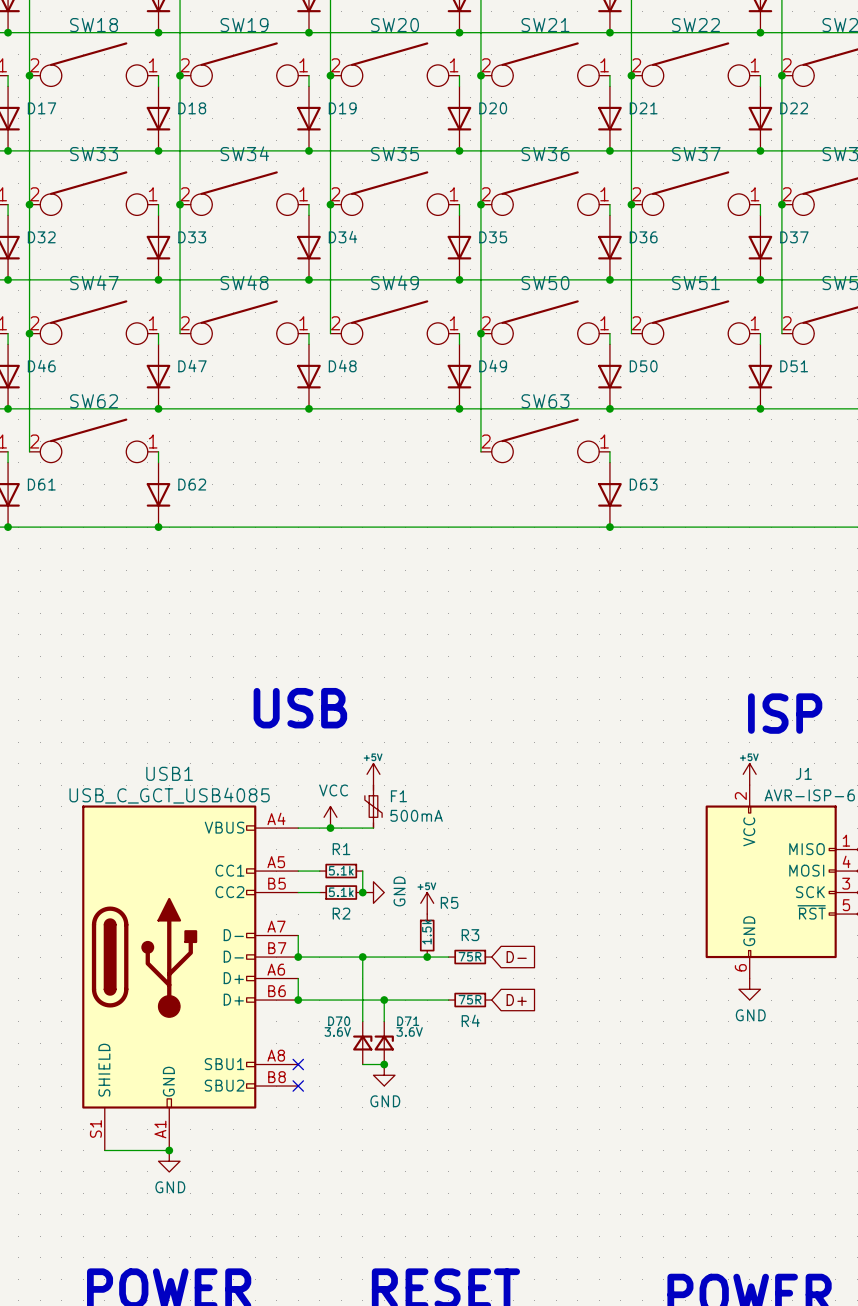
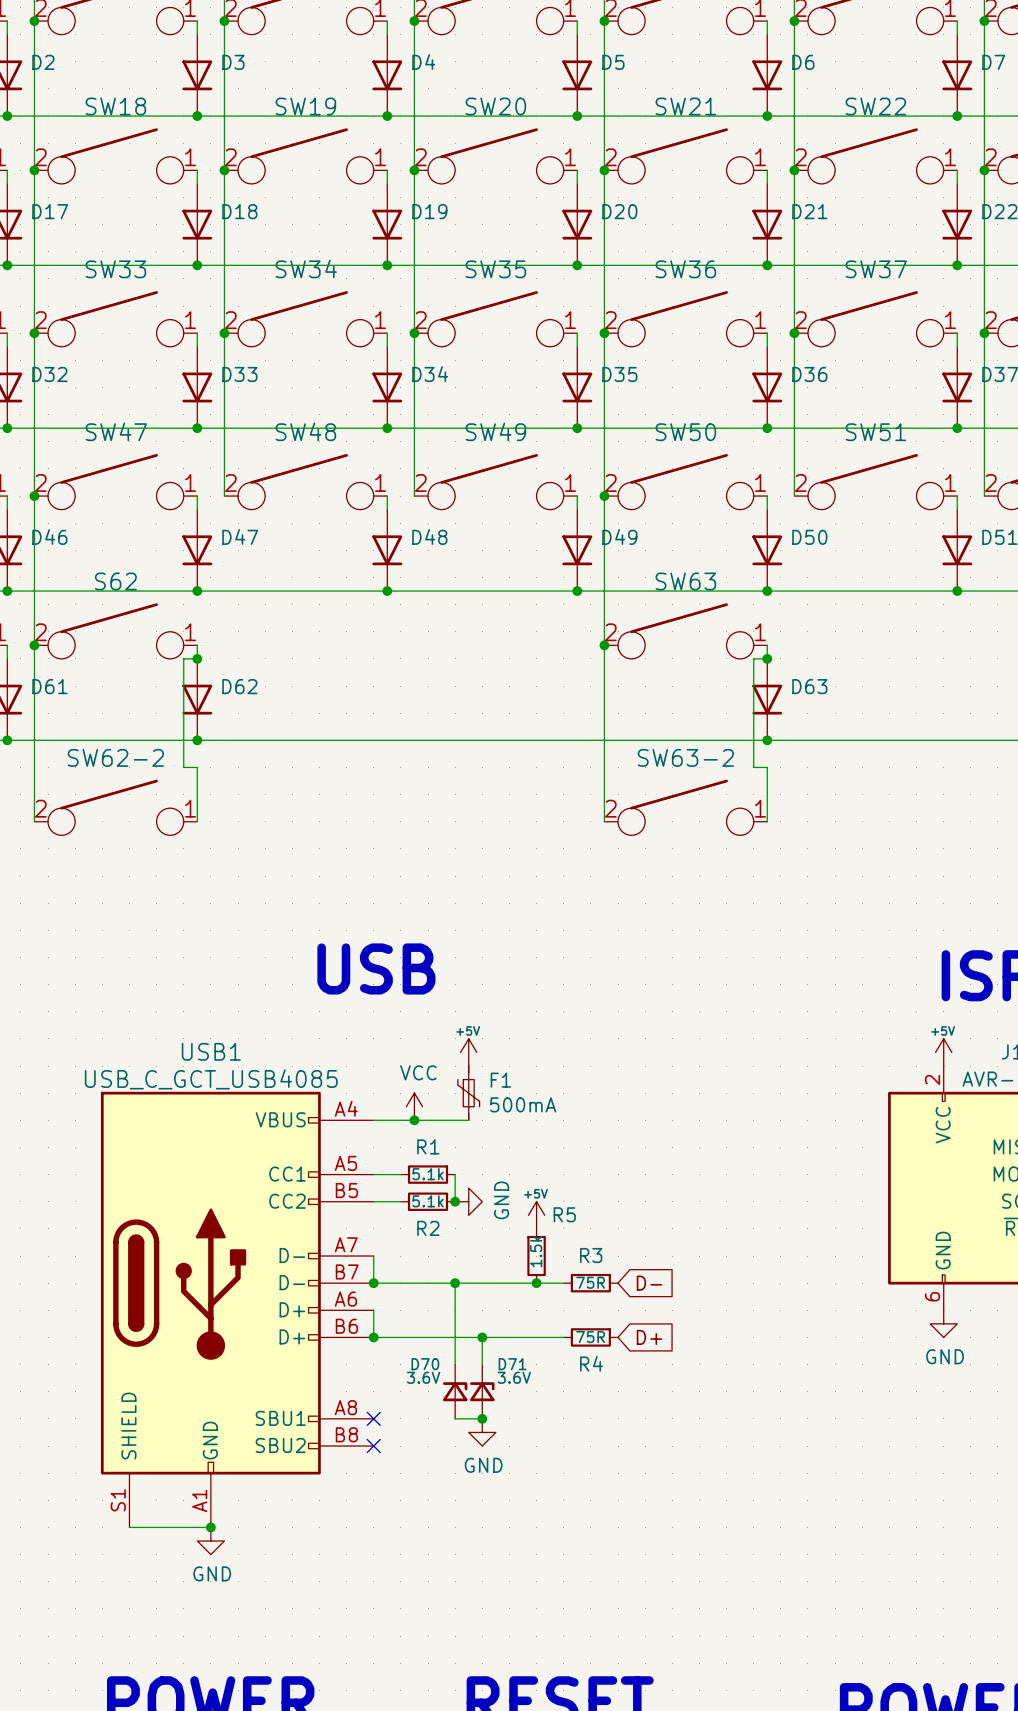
SW62 name: SW62 (94, 401) -> S62 (115, 581)
wire: none -> (34, 645) (34, 821)
junction: none -> (34, 645)
wire: none -> (604, 645) (604, 821)
junction: none -> (604, 645)
wire: none -> (197, 658) (183, 658) (183, 767) (197, 767) (197, 821)
junction: none -> (197, 658)
wire: none -> (767, 658) (753, 658) (753, 767) (767, 767) (767, 821)
junction: none -> (767, 658)
SW62-2: none -> (115, 807)
SW63-2: none -> (685, 807)

